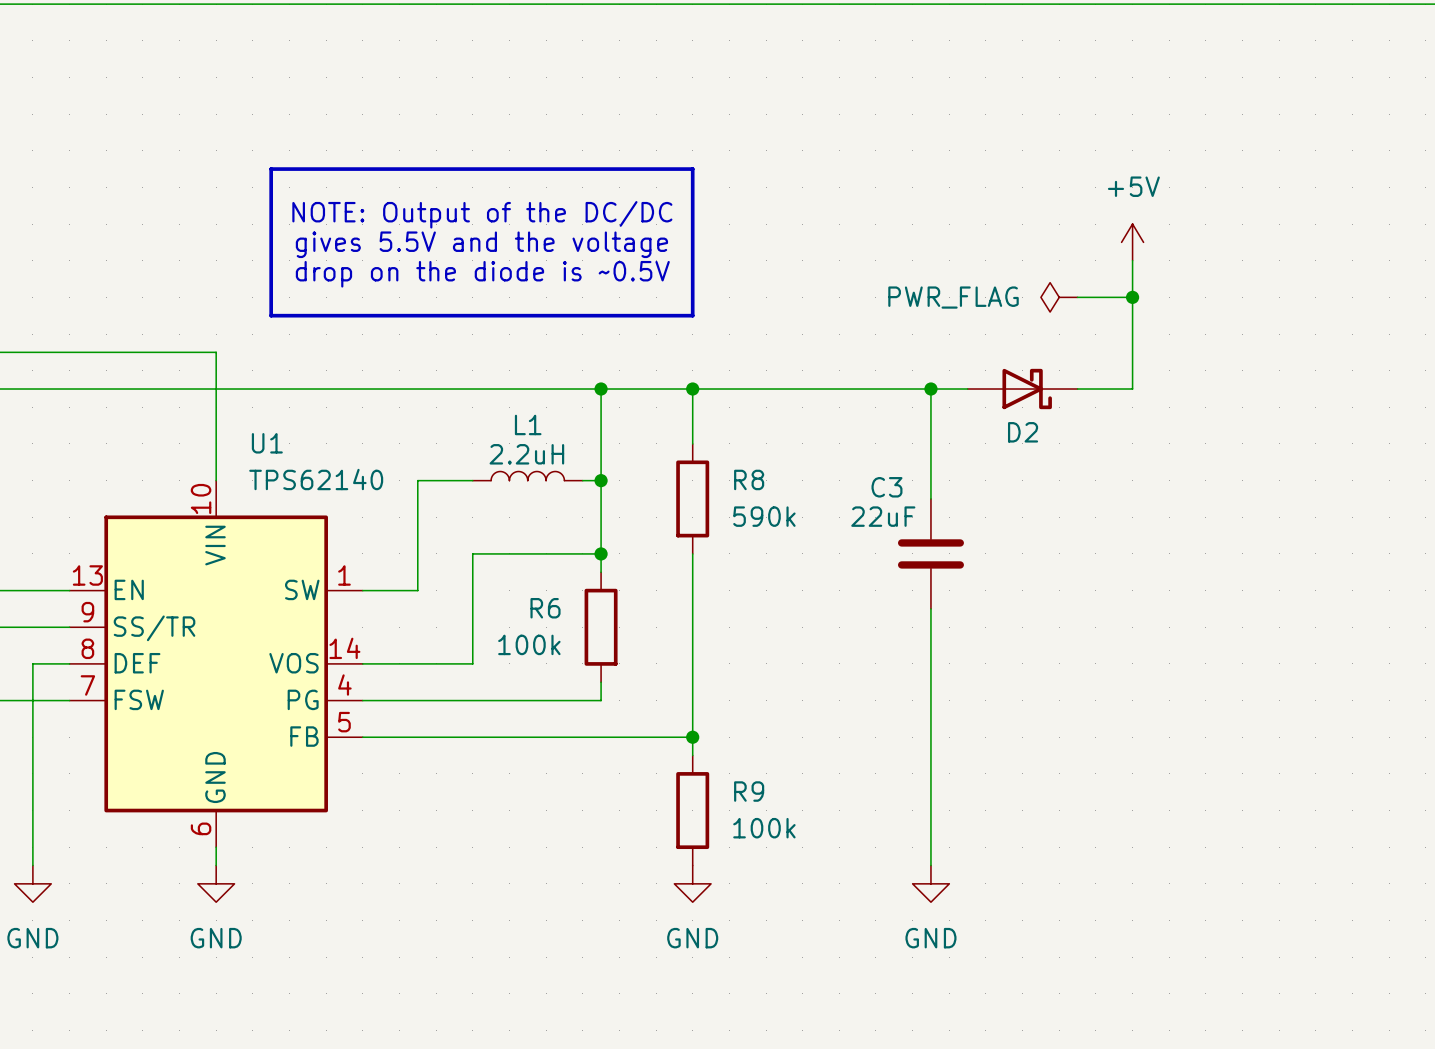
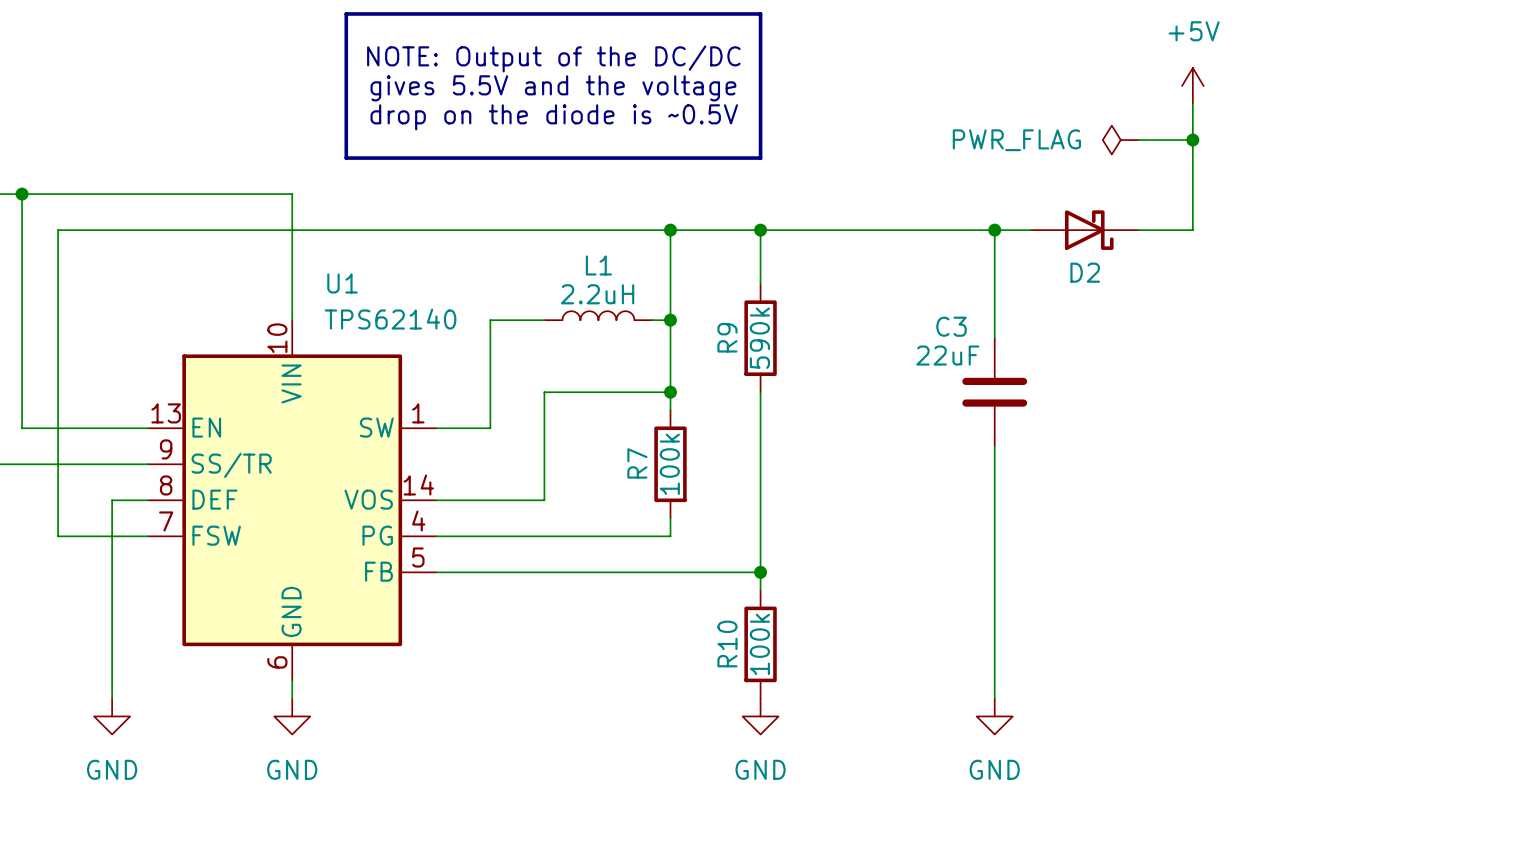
R8 name: R8 (749, 479) -> R9 (727, 337)
R8 value rotation: 0° (764, 516) -> 90° counterclockwise (759, 338)
R6 name: R6 (545, 608) -> R7 (637, 463)
R6 value rotation: 0° (529, 644) -> 90° counterclockwise (669, 464)
R9 name: R9 (749, 791) -> R10 (727, 643)
R9 value rotation: 0° (764, 828) -> 90° counterclockwise (759, 644)

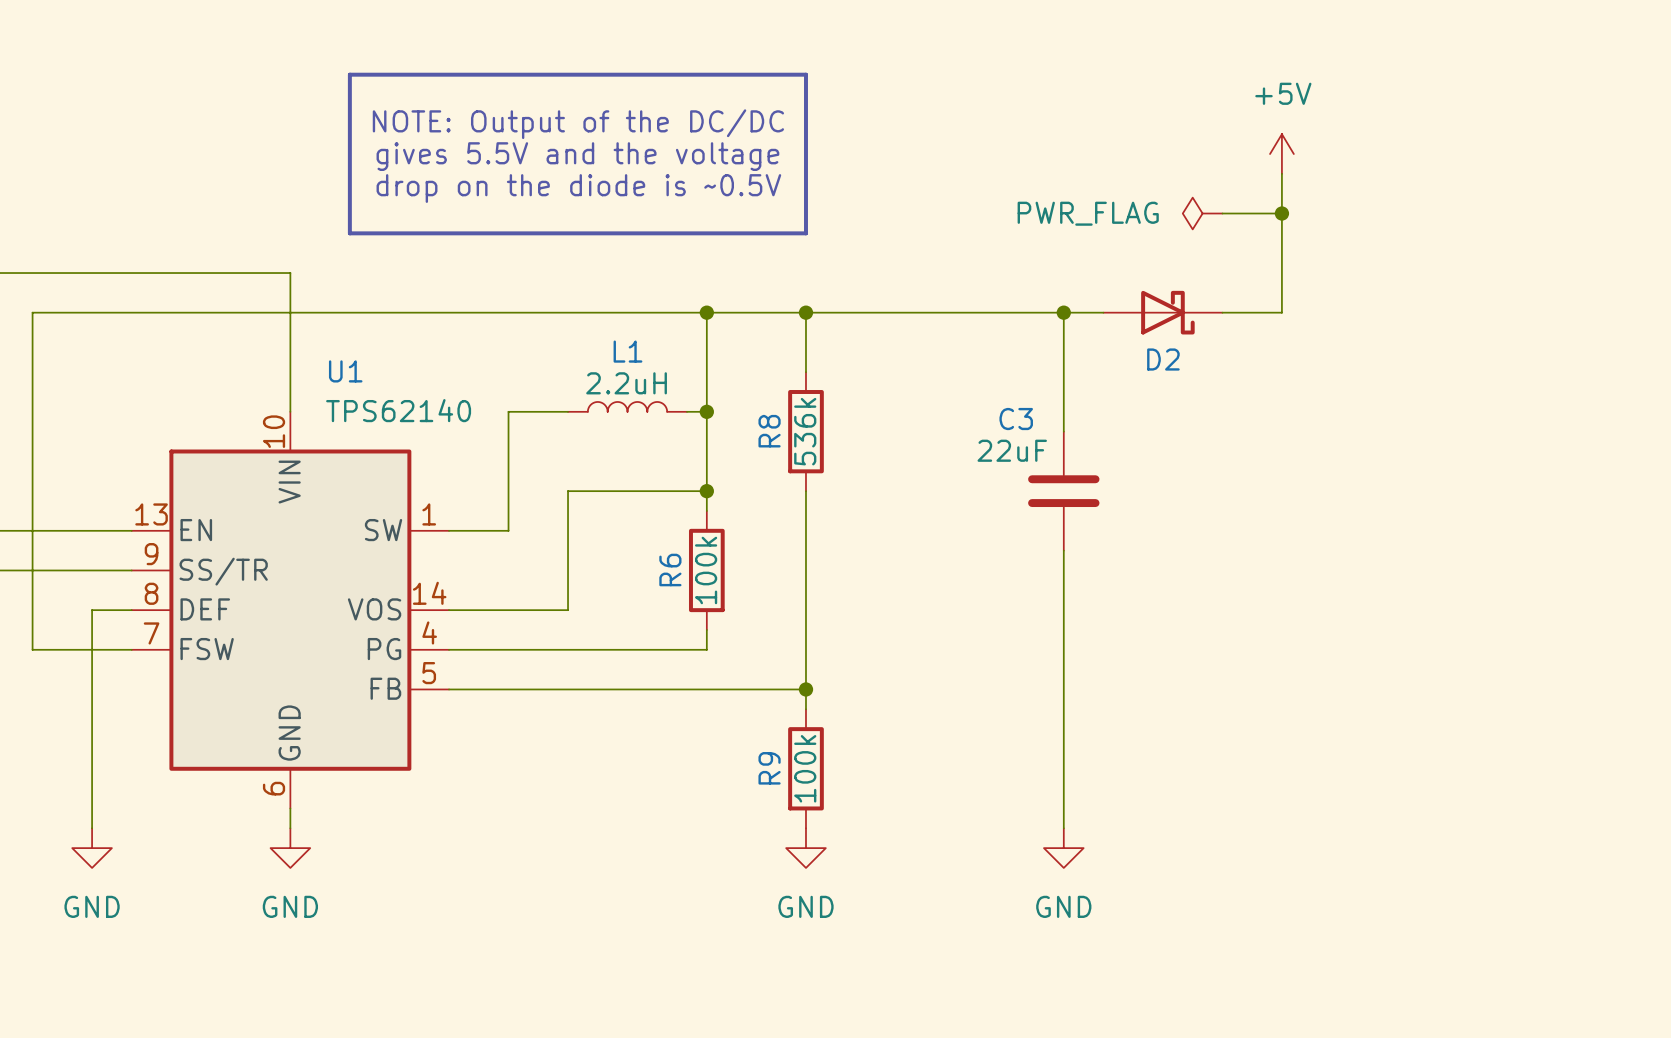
R9 name: R9 (727, 337) -> R8 (769, 431)
R9 value: 590k (759, 338) -> 536k (805, 431)
R7 name: R7 (637, 463) -> R6 (670, 570)
R10 name: R10 (727, 643) -> R9 (769, 768)

